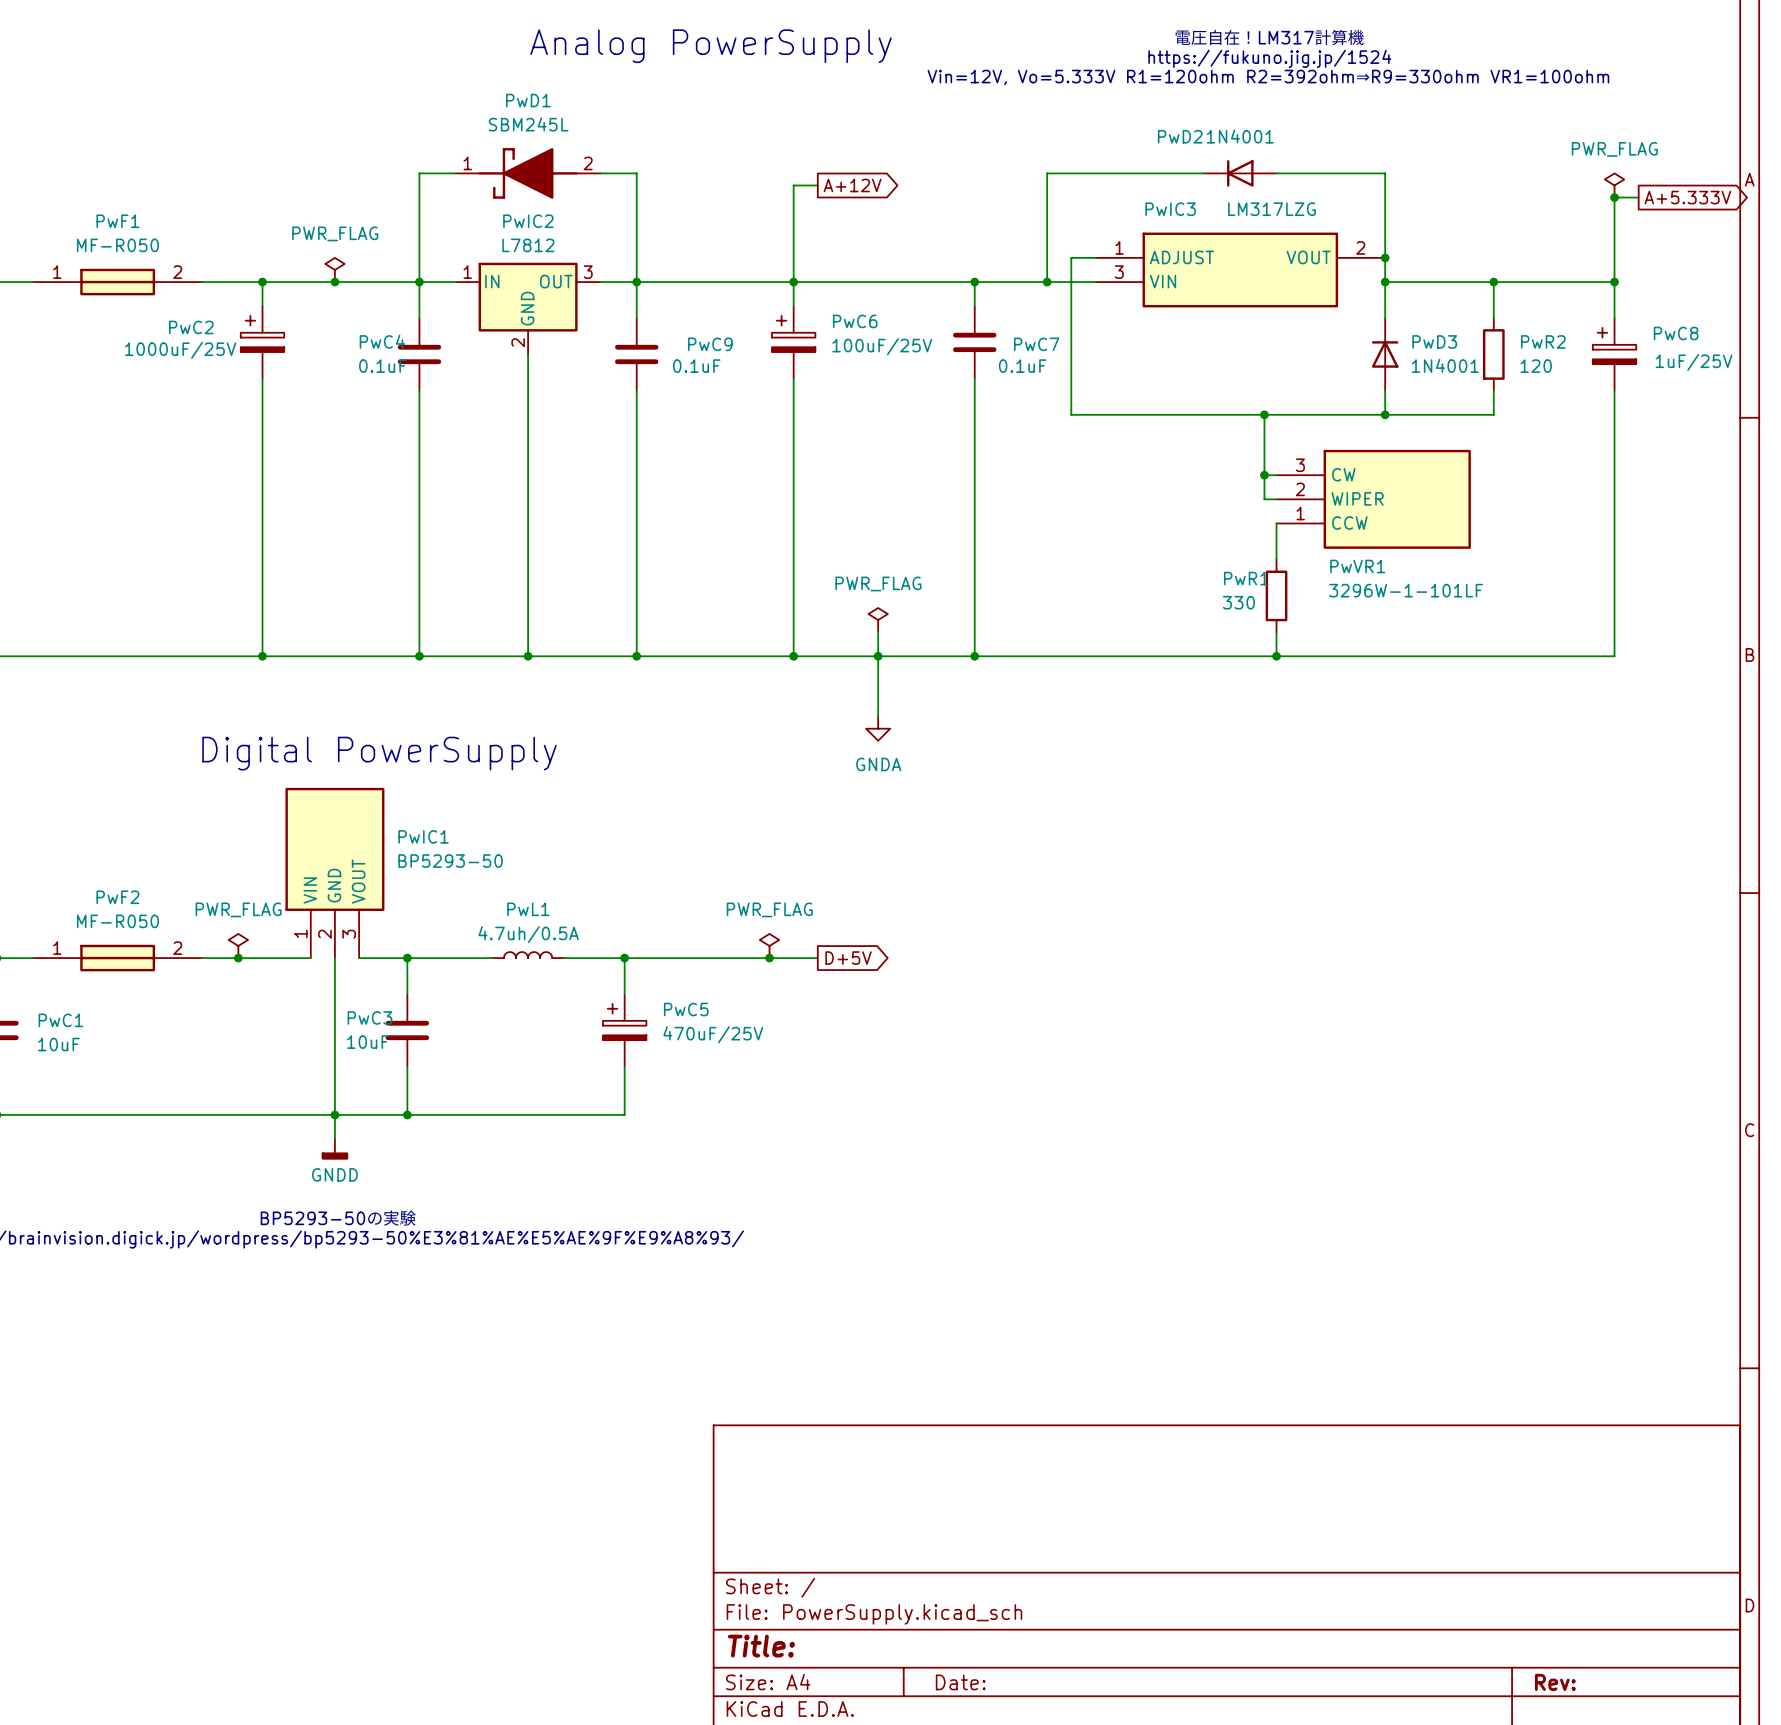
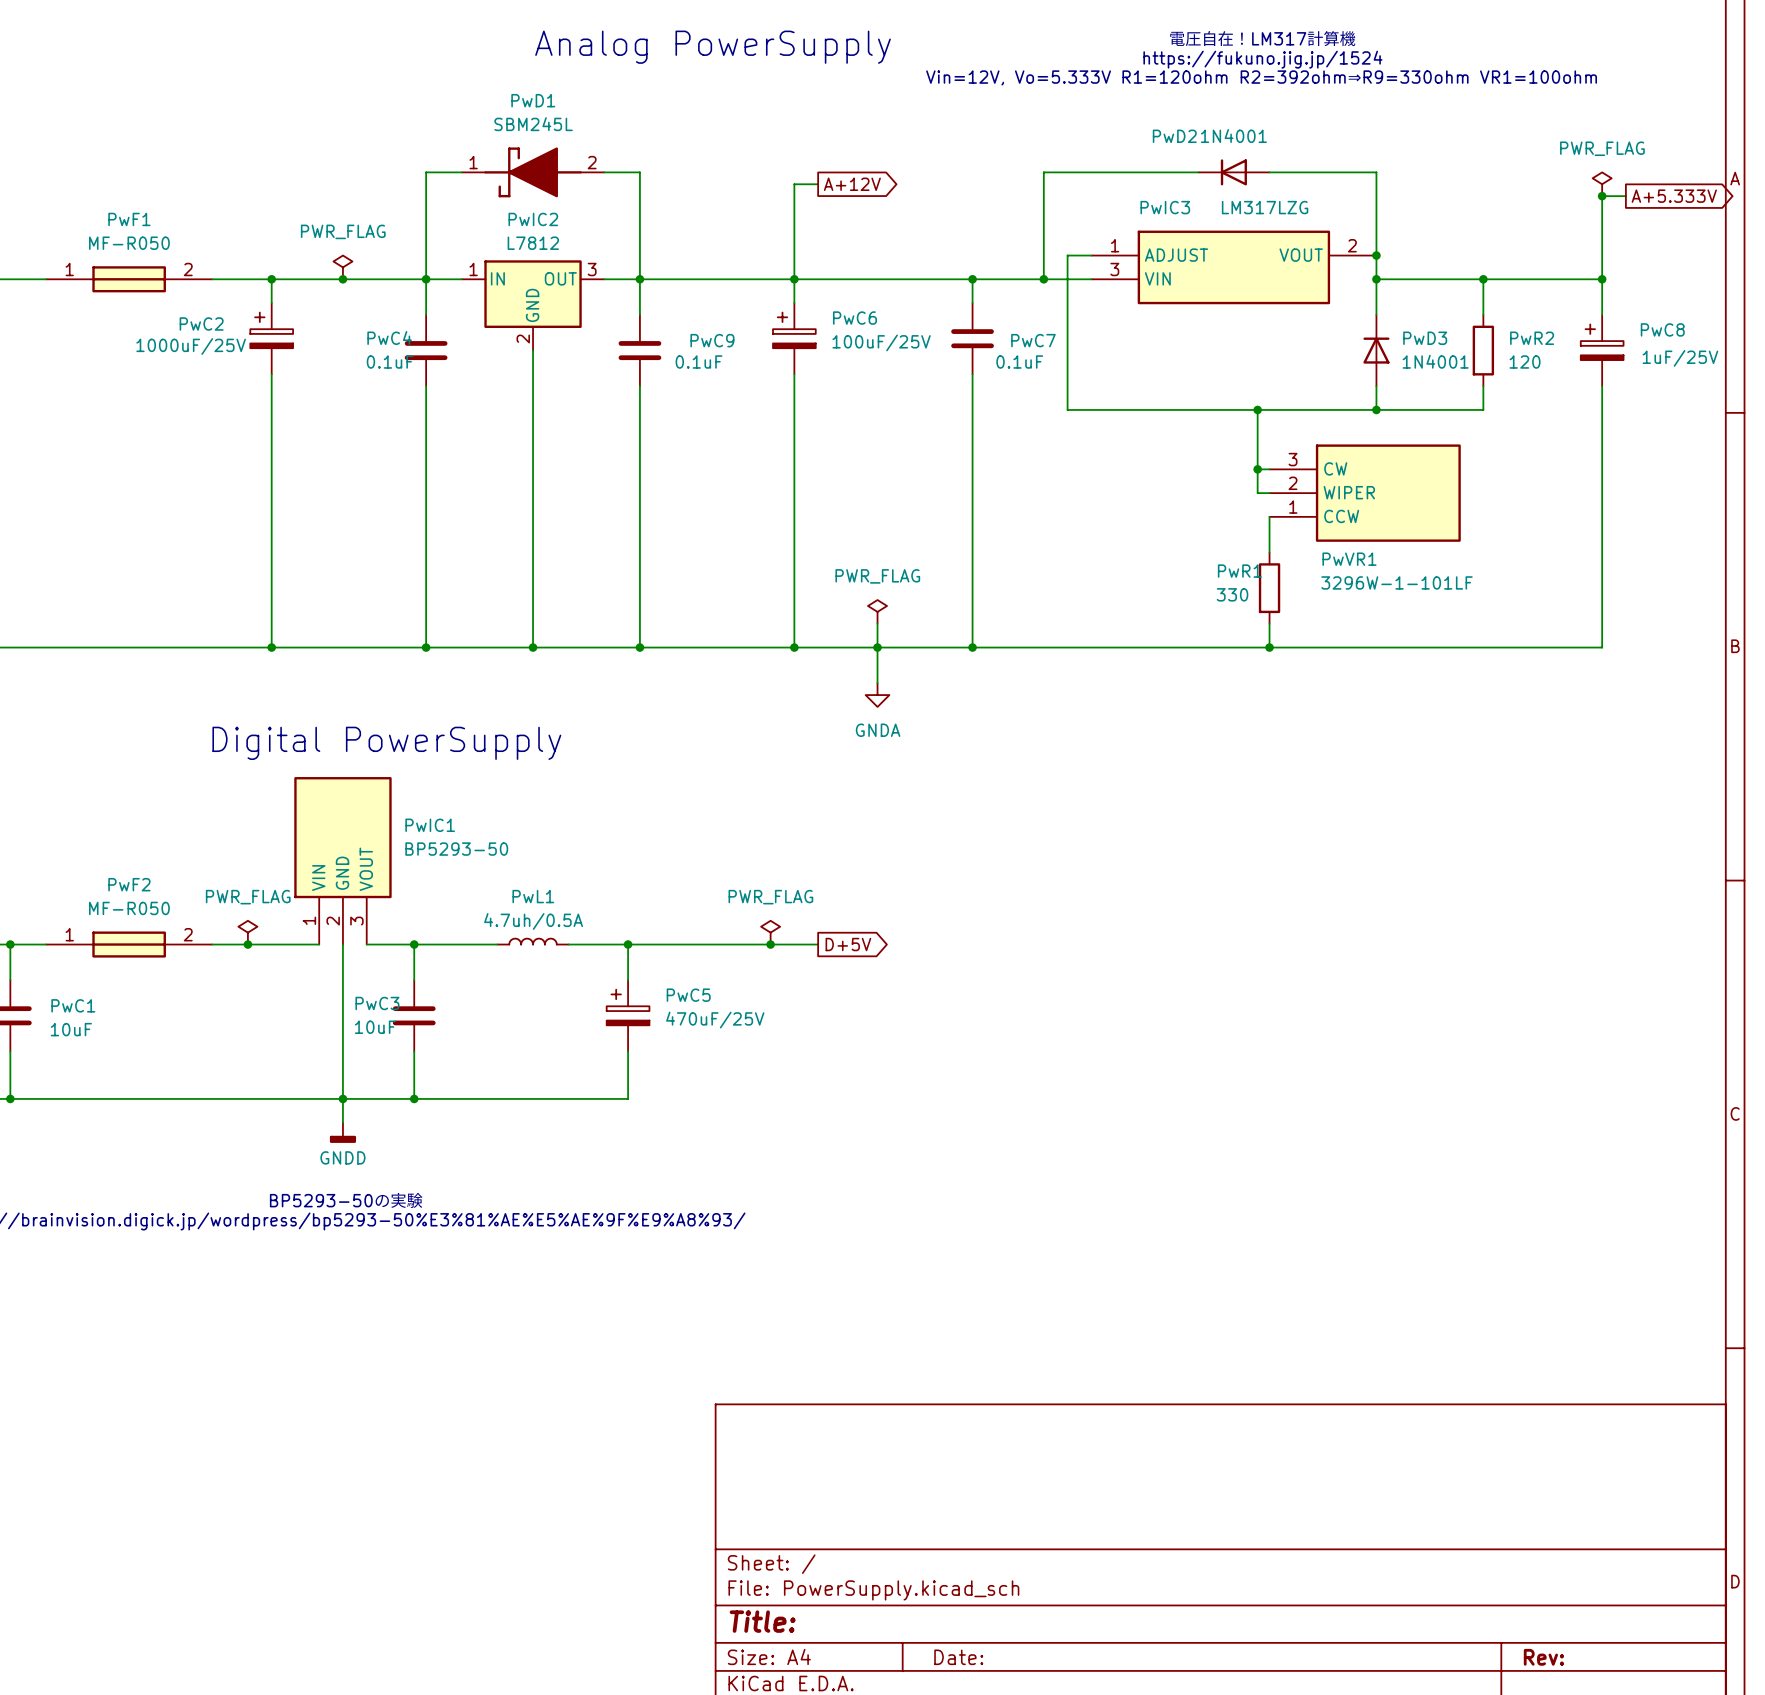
power symbol position: GNDA (878, 728) -> GNDA (877, 695)

